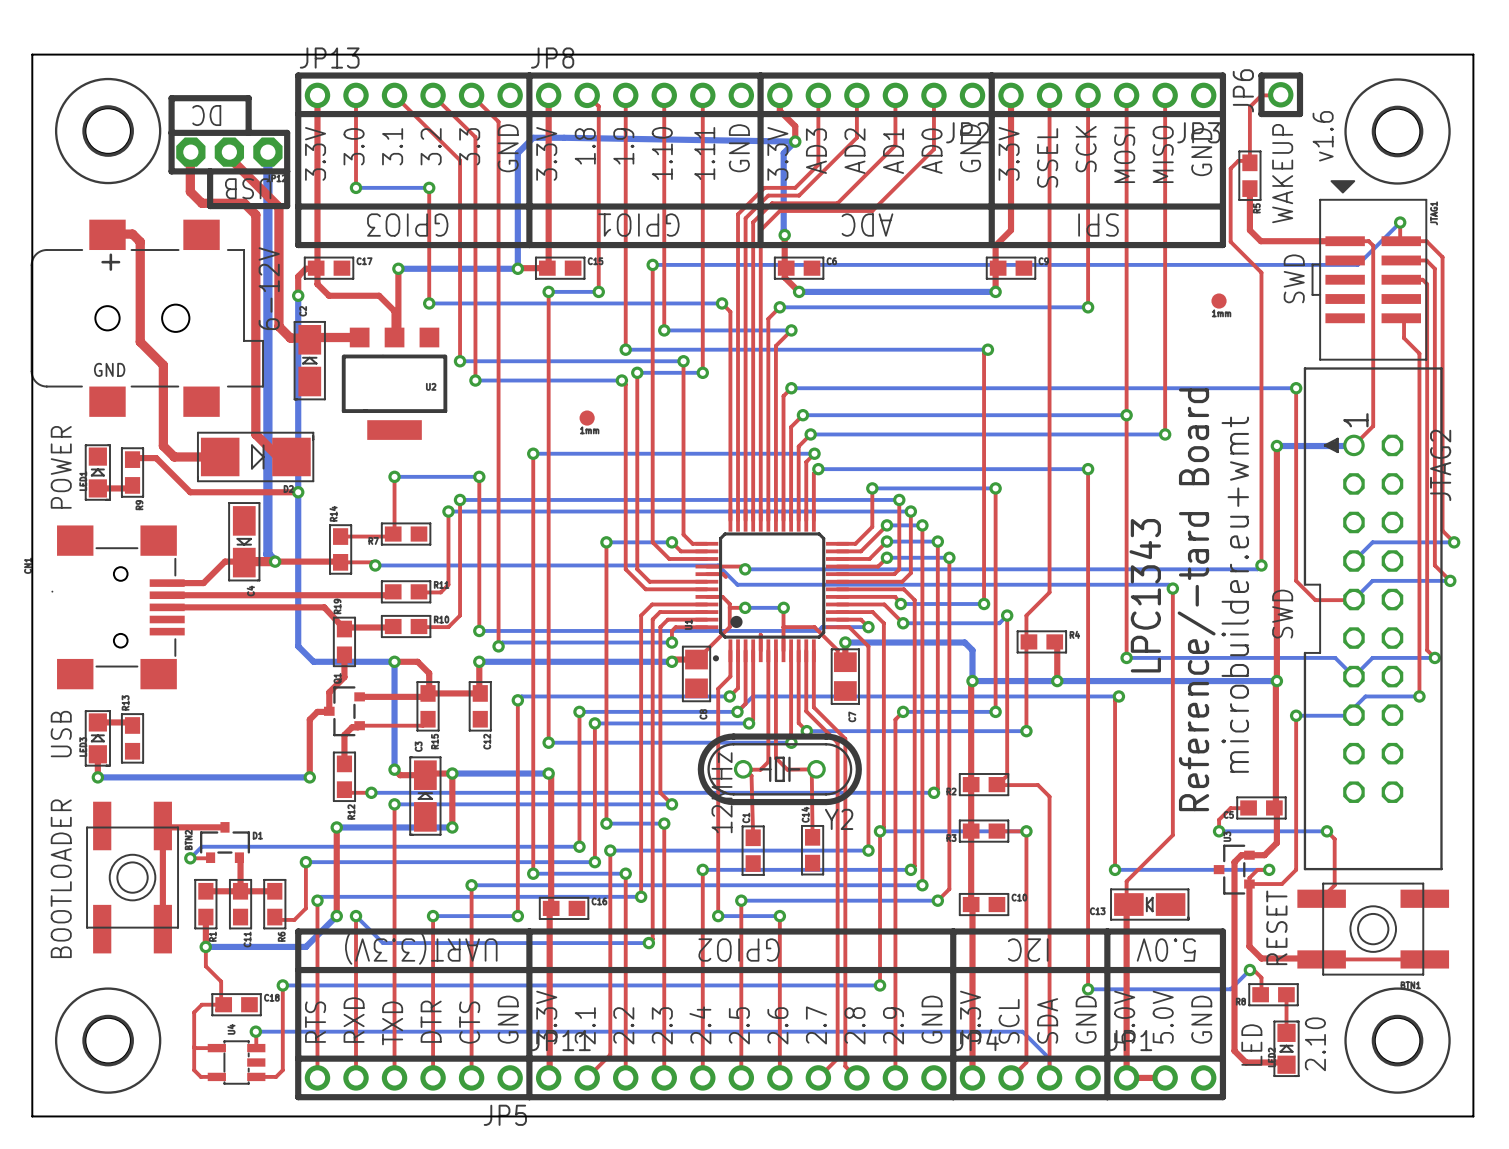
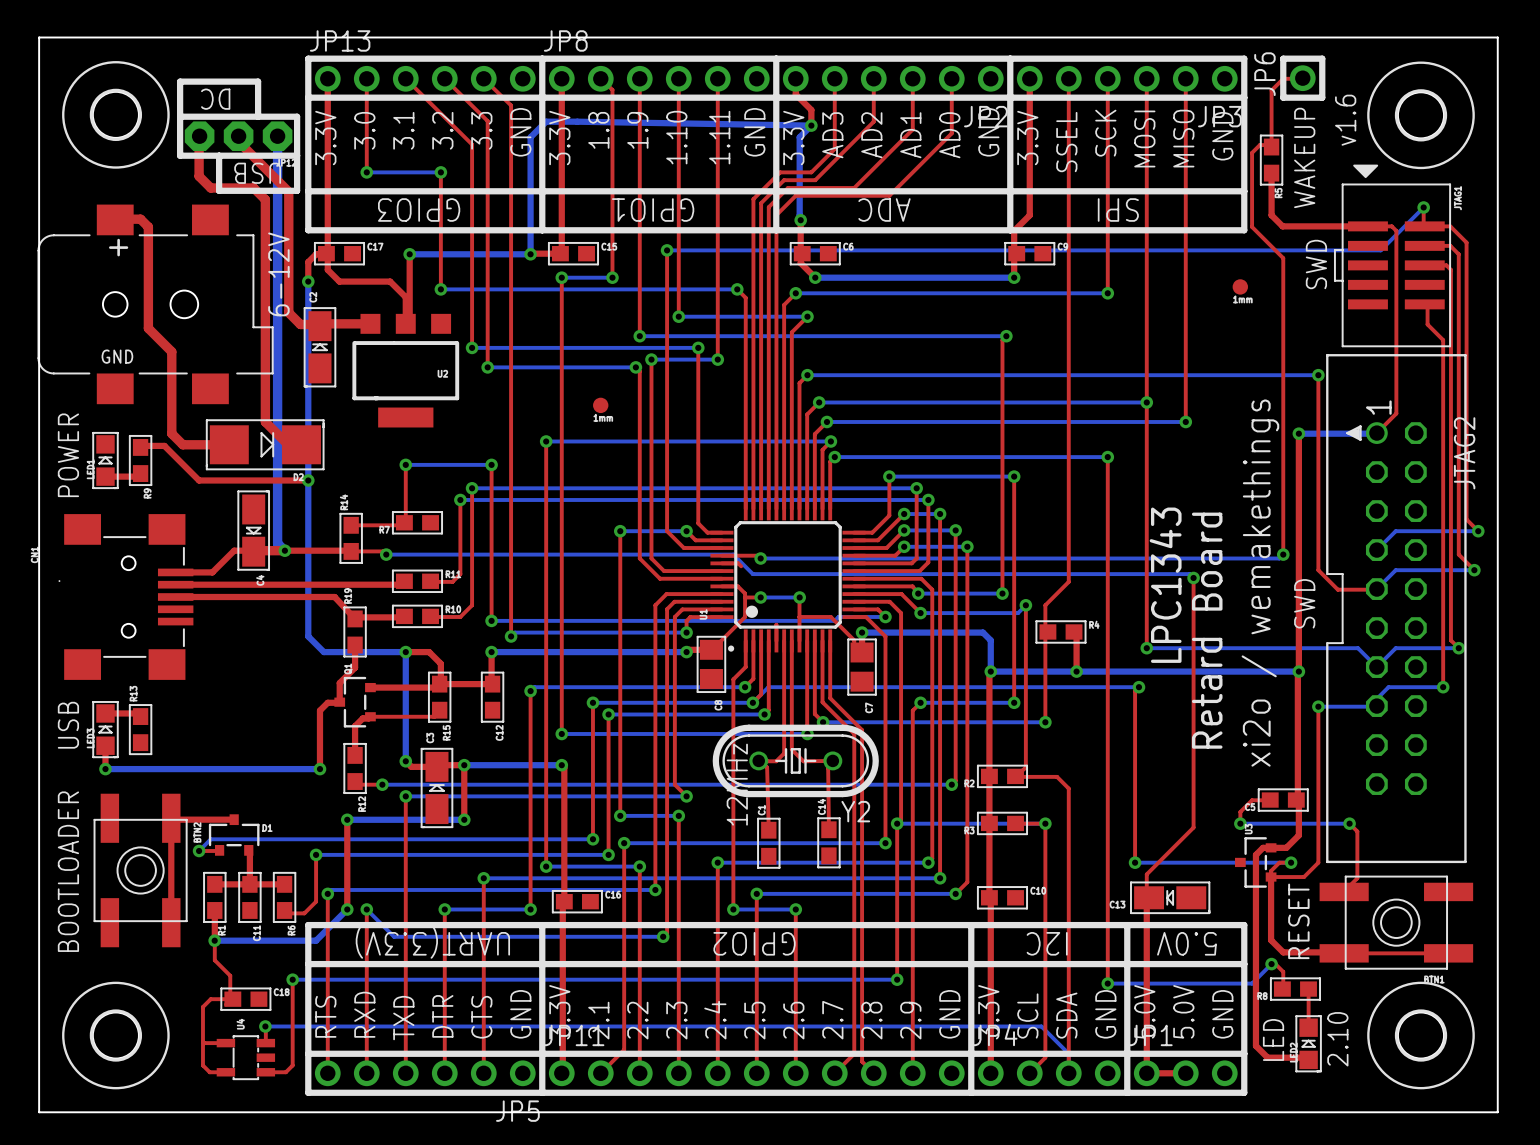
text: microbuilder.eu+wmt (1235, 594) -> xi2o / wemakethings (1260, 583)
text: Reference/-tard Board (1196, 599) -> Retard Board (1207, 630)

